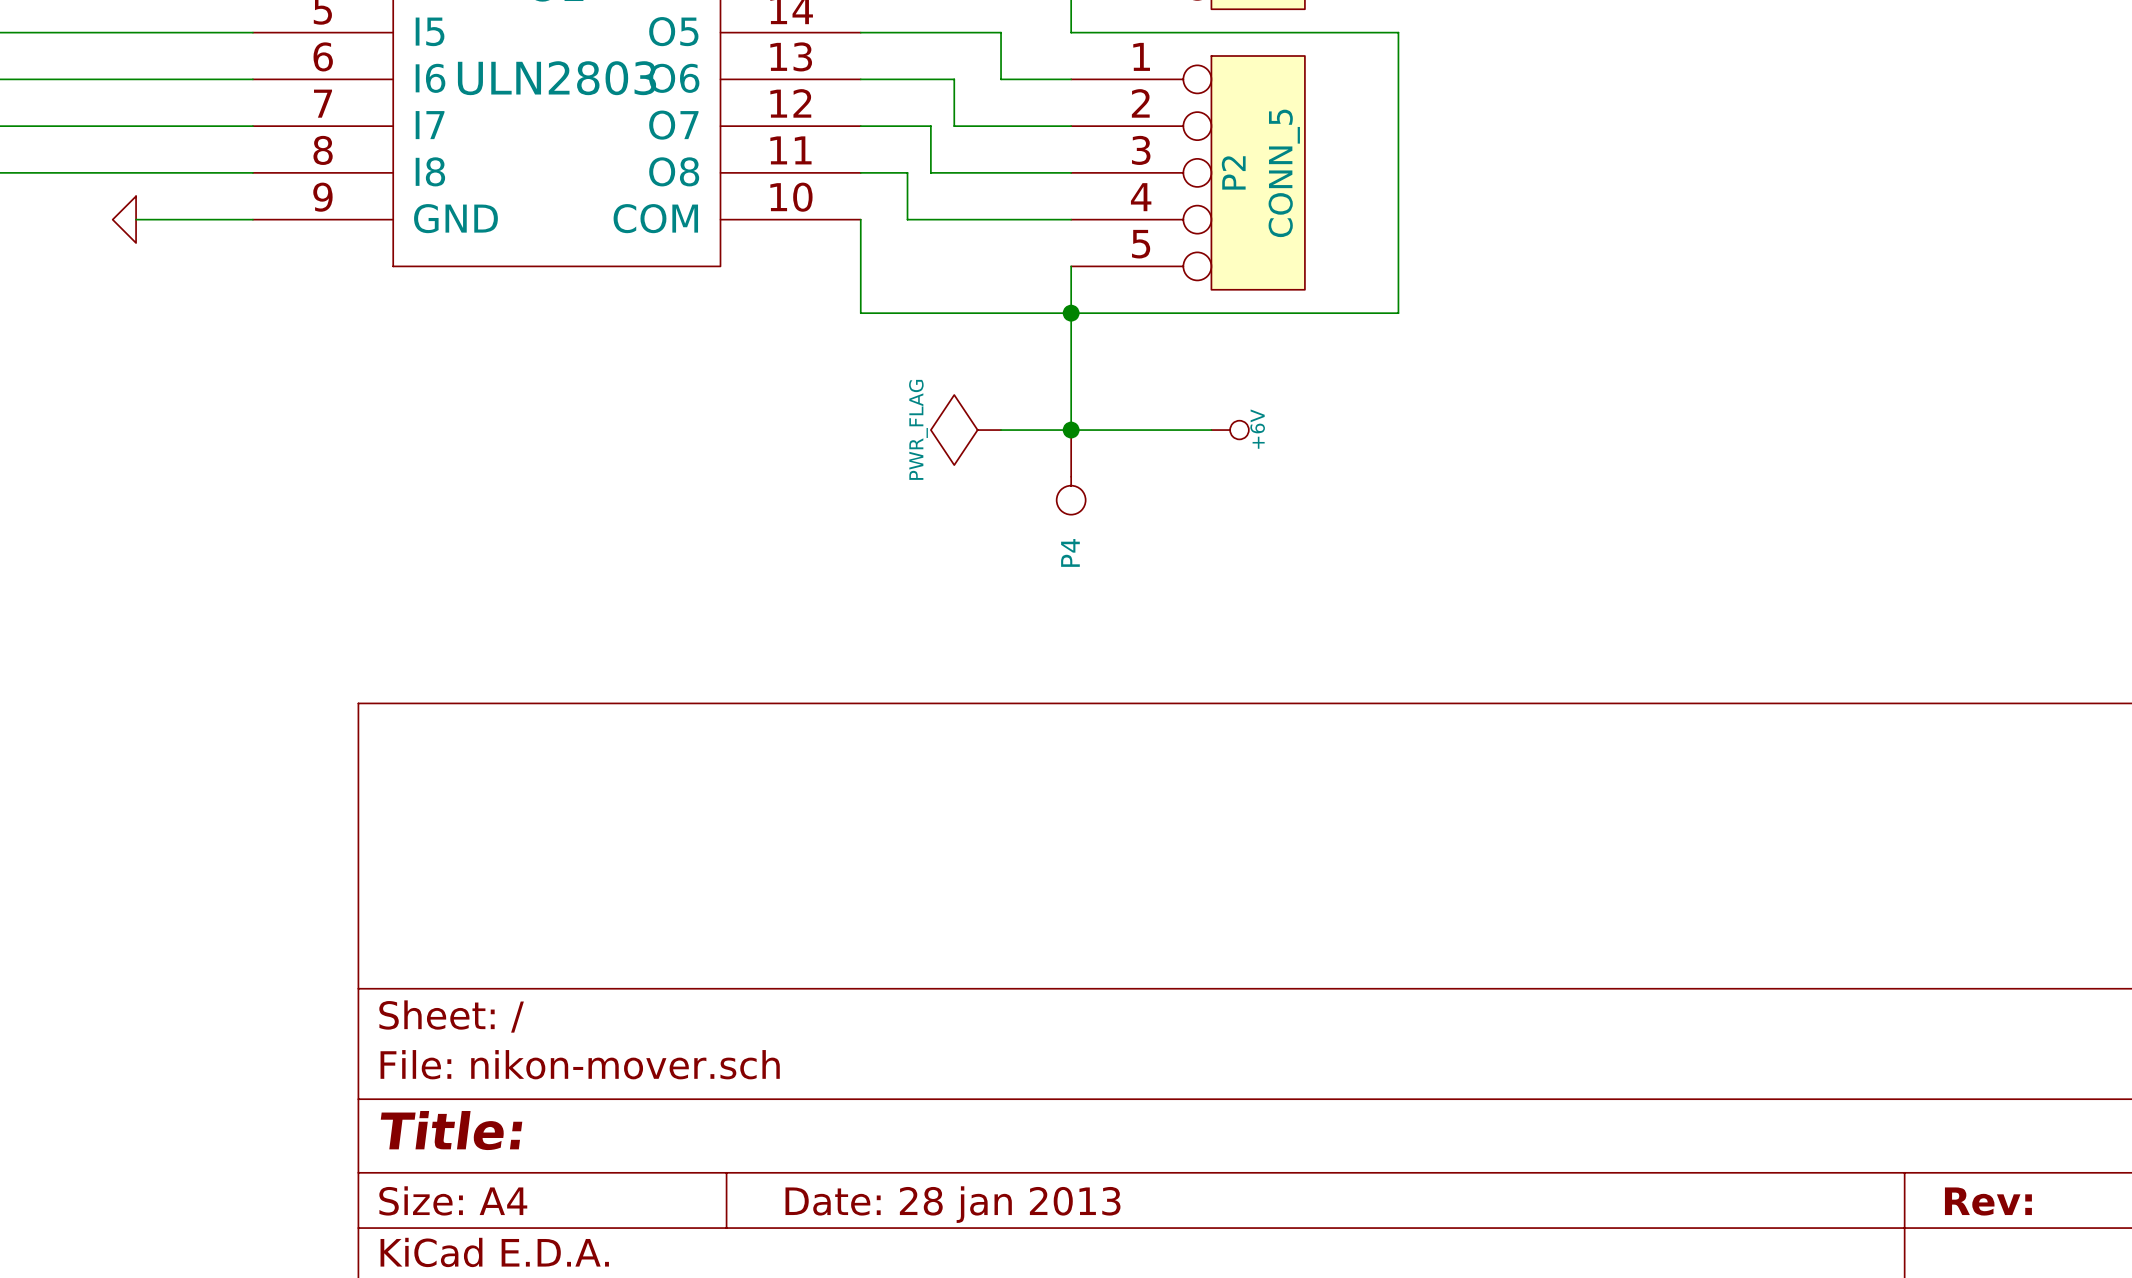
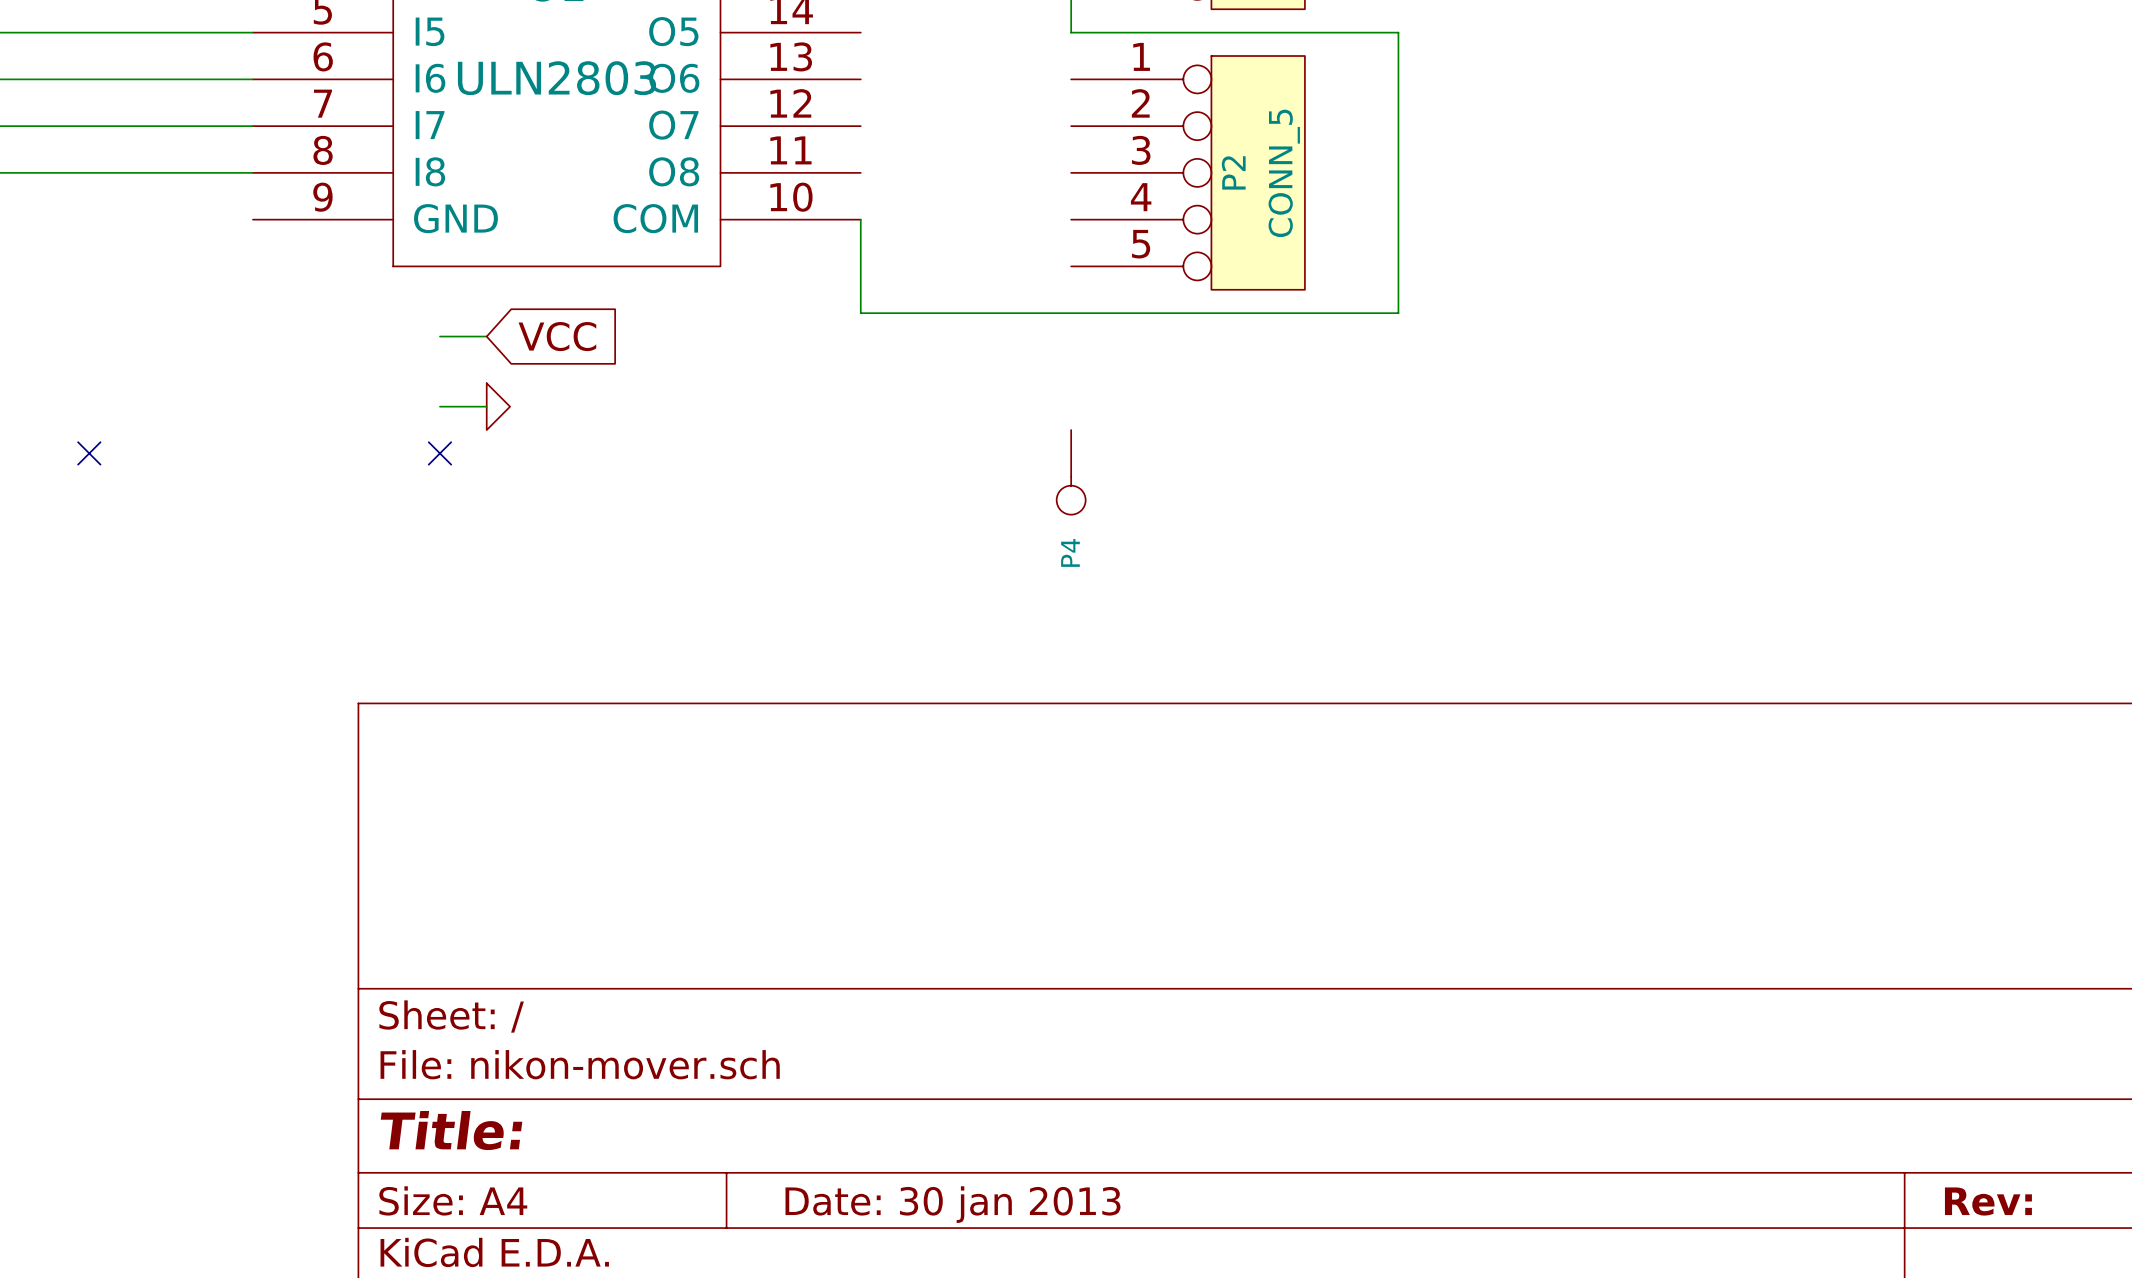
wire: (860, 32) (1001, 32) (1001, 79) (1071, 79) -> none
wire: (860, 79) (954, 79) (954, 126) (1071, 126) -> none
wire: (860, 126) (930, 126) (930, 172) (1071, 172) -> none
wire: (860, 172) (907, 172) (907, 219) (1071, 219) -> none
power symbol: (124, 219) -> none
wire: (136, 219) (252, 219) -> none
wire: (1071, 266) (1071, 430) -> none
junction: (1071, 313) -> none
wire: none -> (439, 336) (486, 336)
global label: none -> VCC (557, 336)
wire: none -> (439, 406) (486, 406)
power symbol: none -> (498, 406)
power symbol: PWR_FLAG (965, 430) -> none
wire: (1001, 430) (1211, 430) -> none
junction: (1071, 430) -> none
power symbol: +6V (1230, 430) -> none
no-connect mark: none -> (89, 453)
no-connect mark: none -> (439, 453)
title block: Date: 28 jan 2013 (952, 1204) -> Date: 30 jan 2013 (952, 1204)

